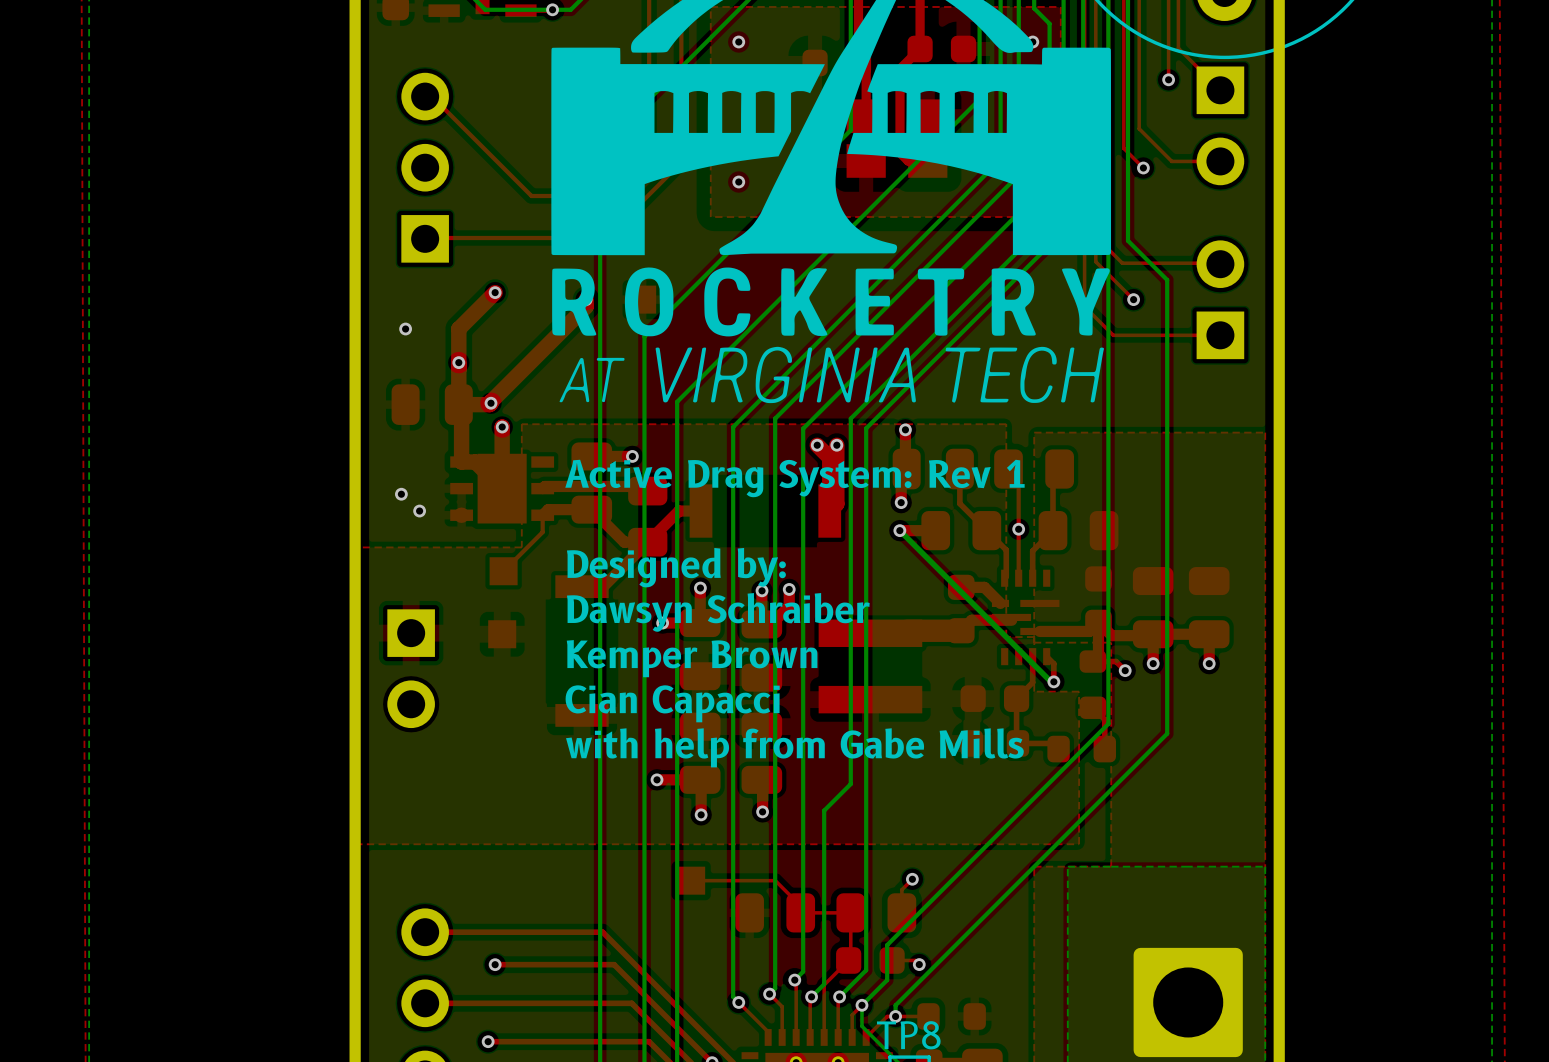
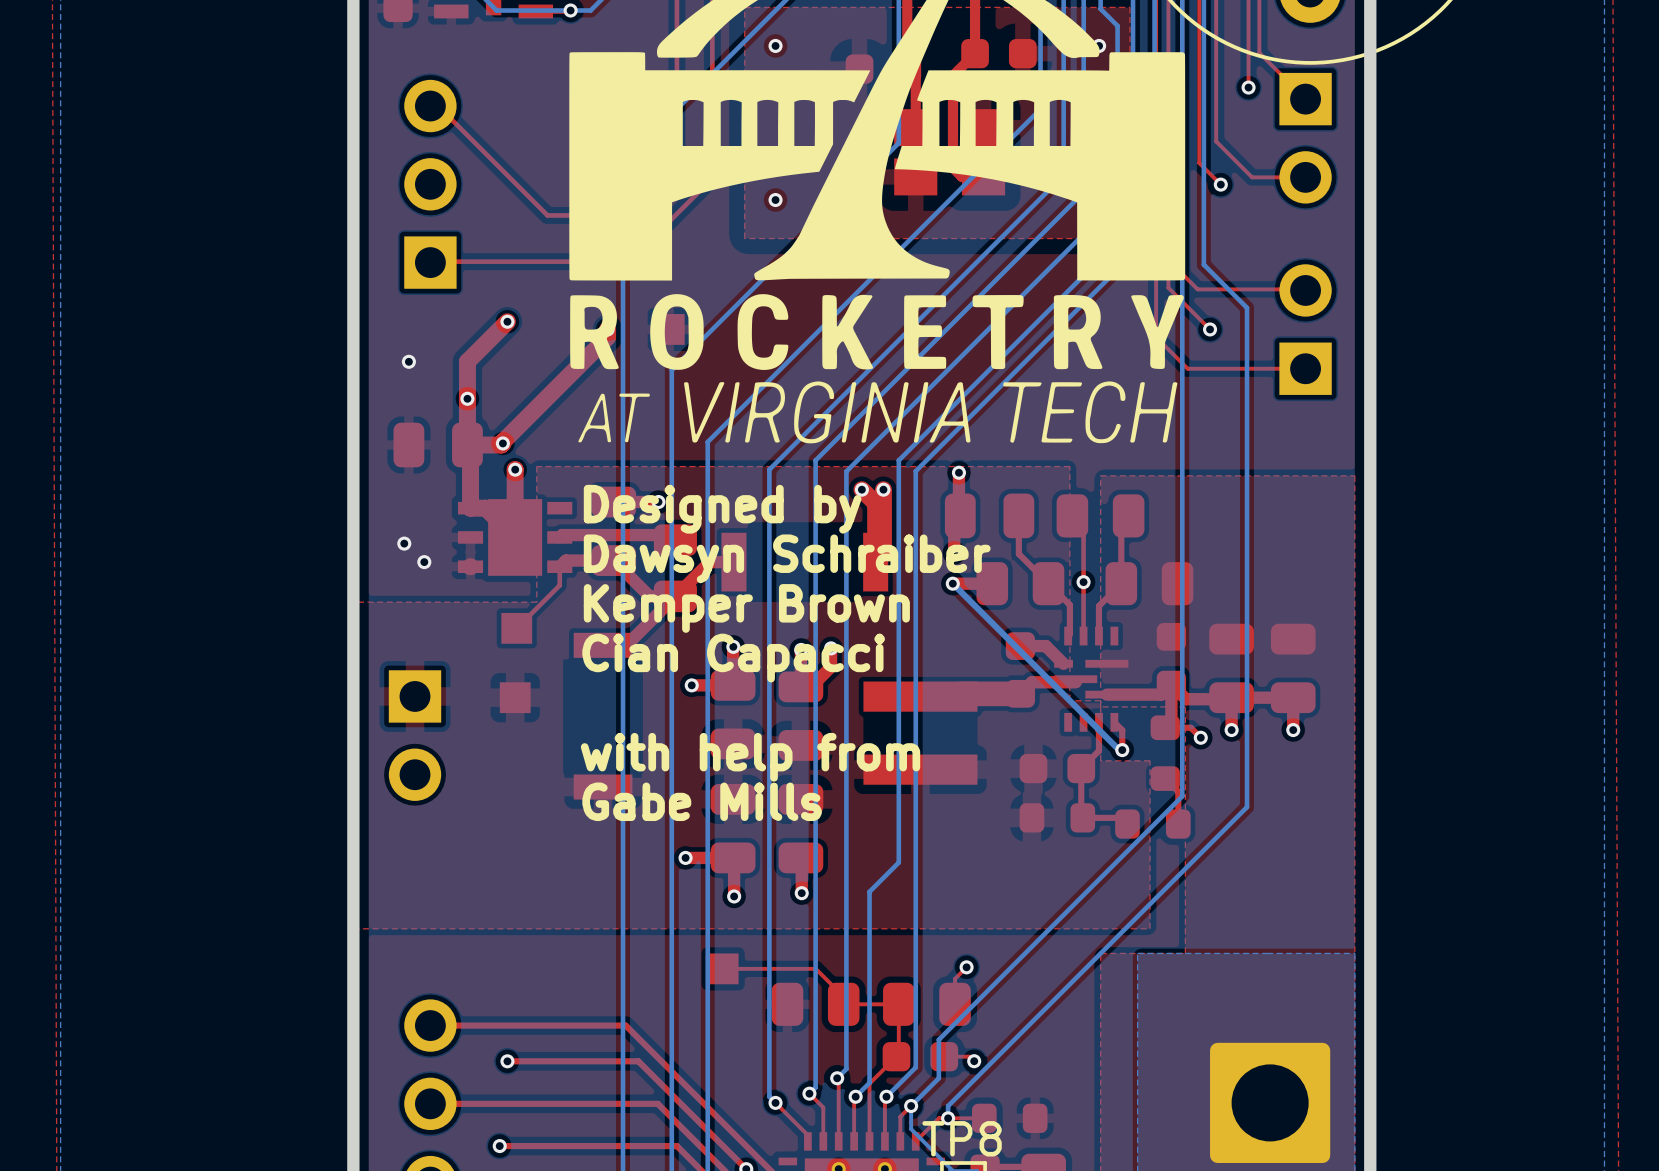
text: none -> Designed by (722, 509)
text: Active Drag System: Rev 1 (794, 478) -> none
text: Designed by: (676, 567) -> none
text position: Dawsyn Schraiber (718, 612) -> Dawsyn Schraiber (787, 558)
text position: Kemper Brown (692, 658) -> Kemper Brown (746, 608)
text: none -> with help from (750, 757)
text position: Cian Capacci (672, 703) -> Cian Capacci (733, 658)
text: none -> Gabe Mills (702, 801)
text: with help from Gabe Mills (794, 747) -> none

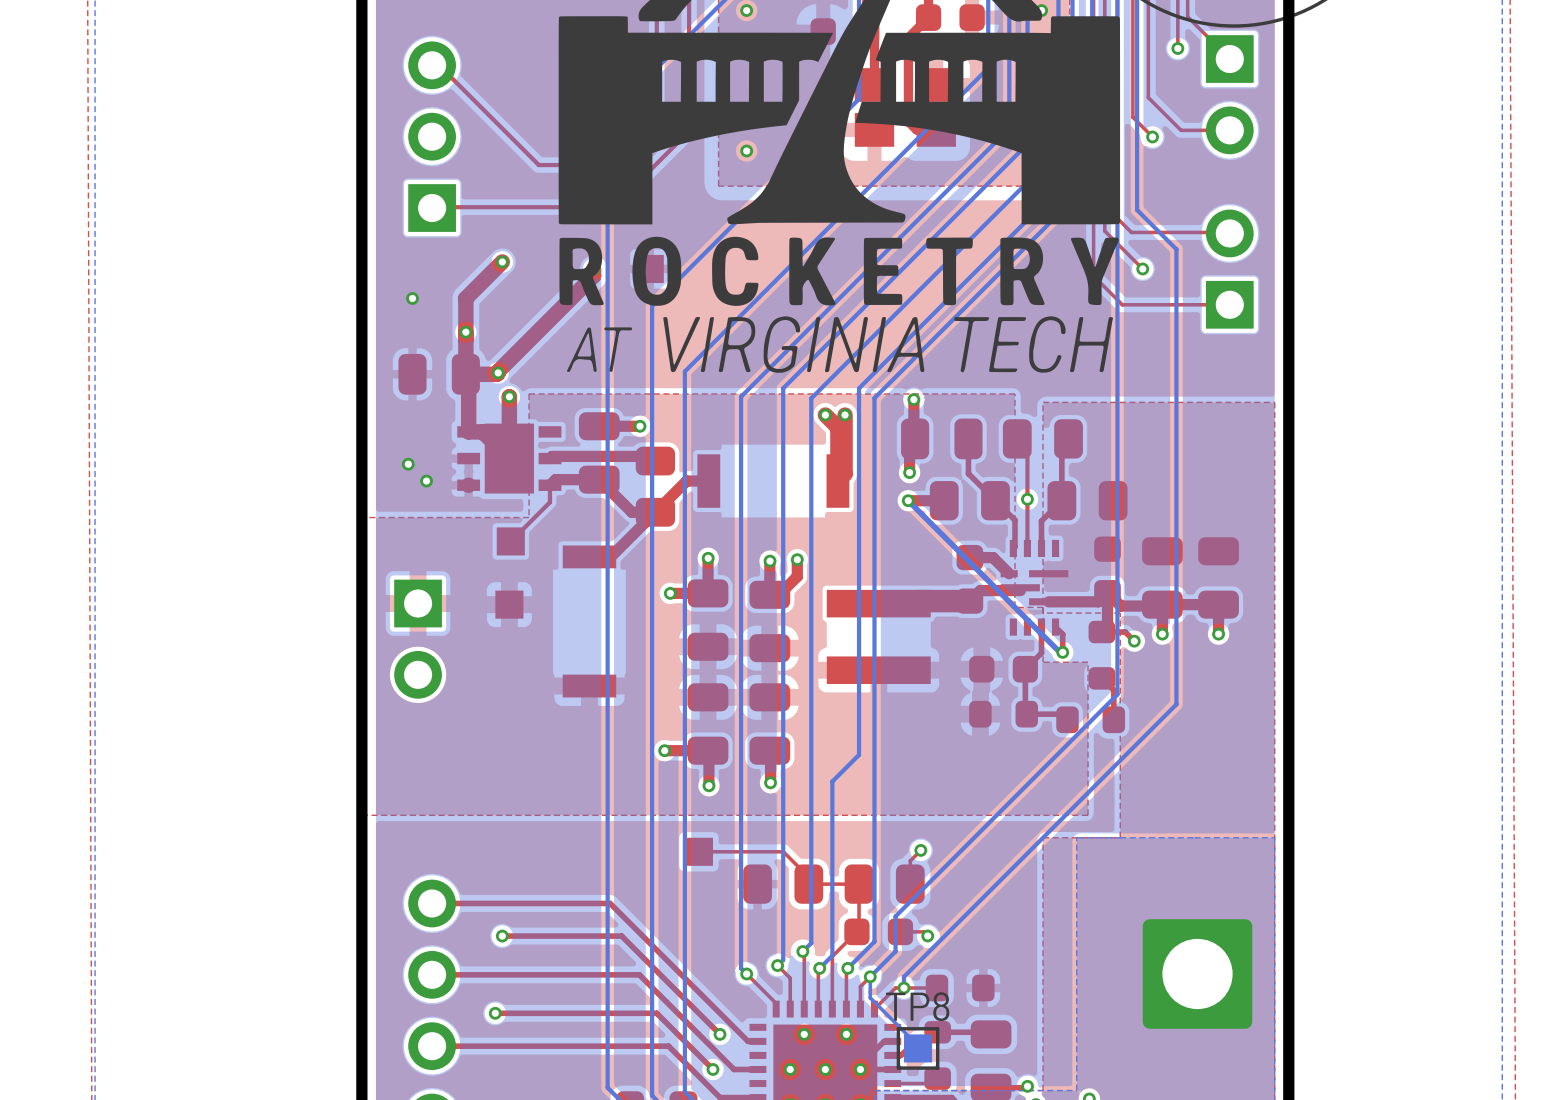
text: Designed by (722, 509) -> none
text: Dawsyn Schraiber (787, 558) -> none
text: Kemper Brown (746, 608) -> none
text: Cian Capacci (733, 658) -> none
text: with help from (750, 757) -> none
text: Gabe Mills (702, 801) -> none

